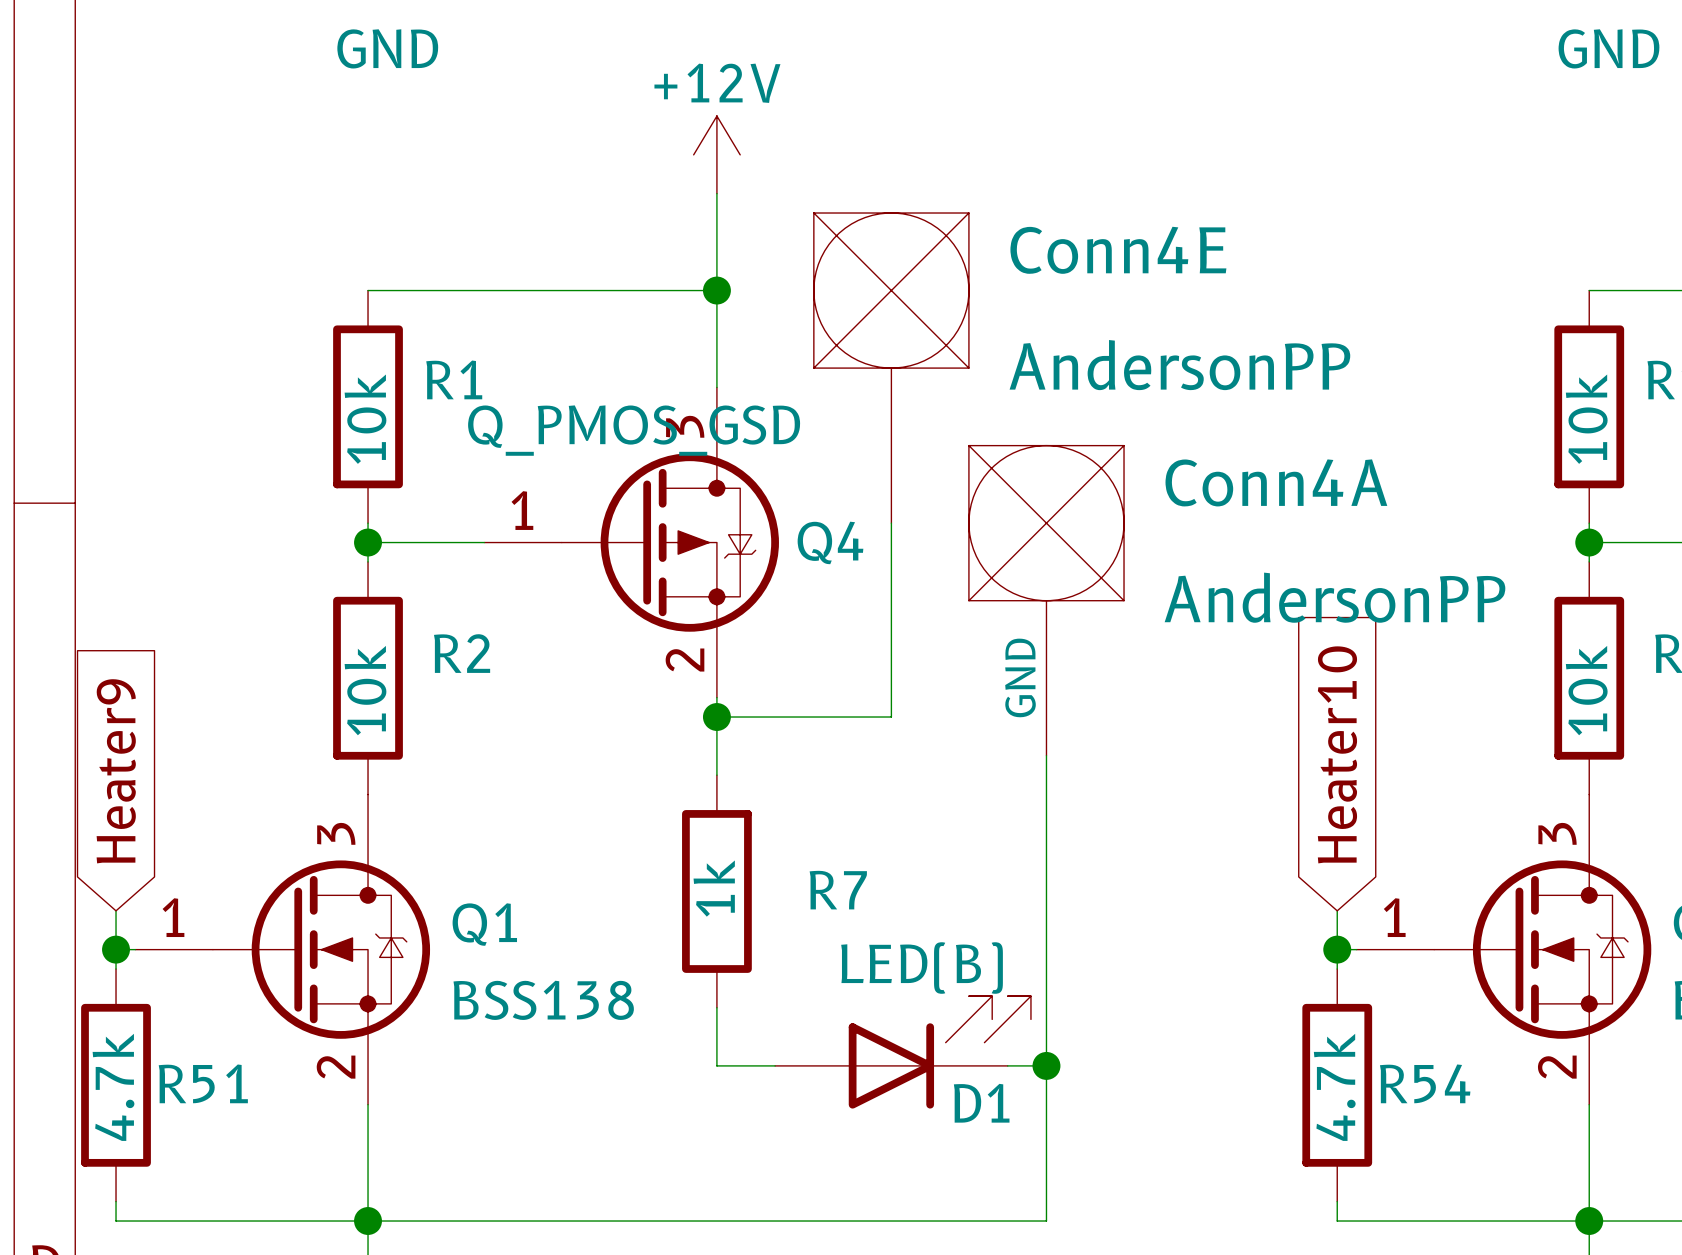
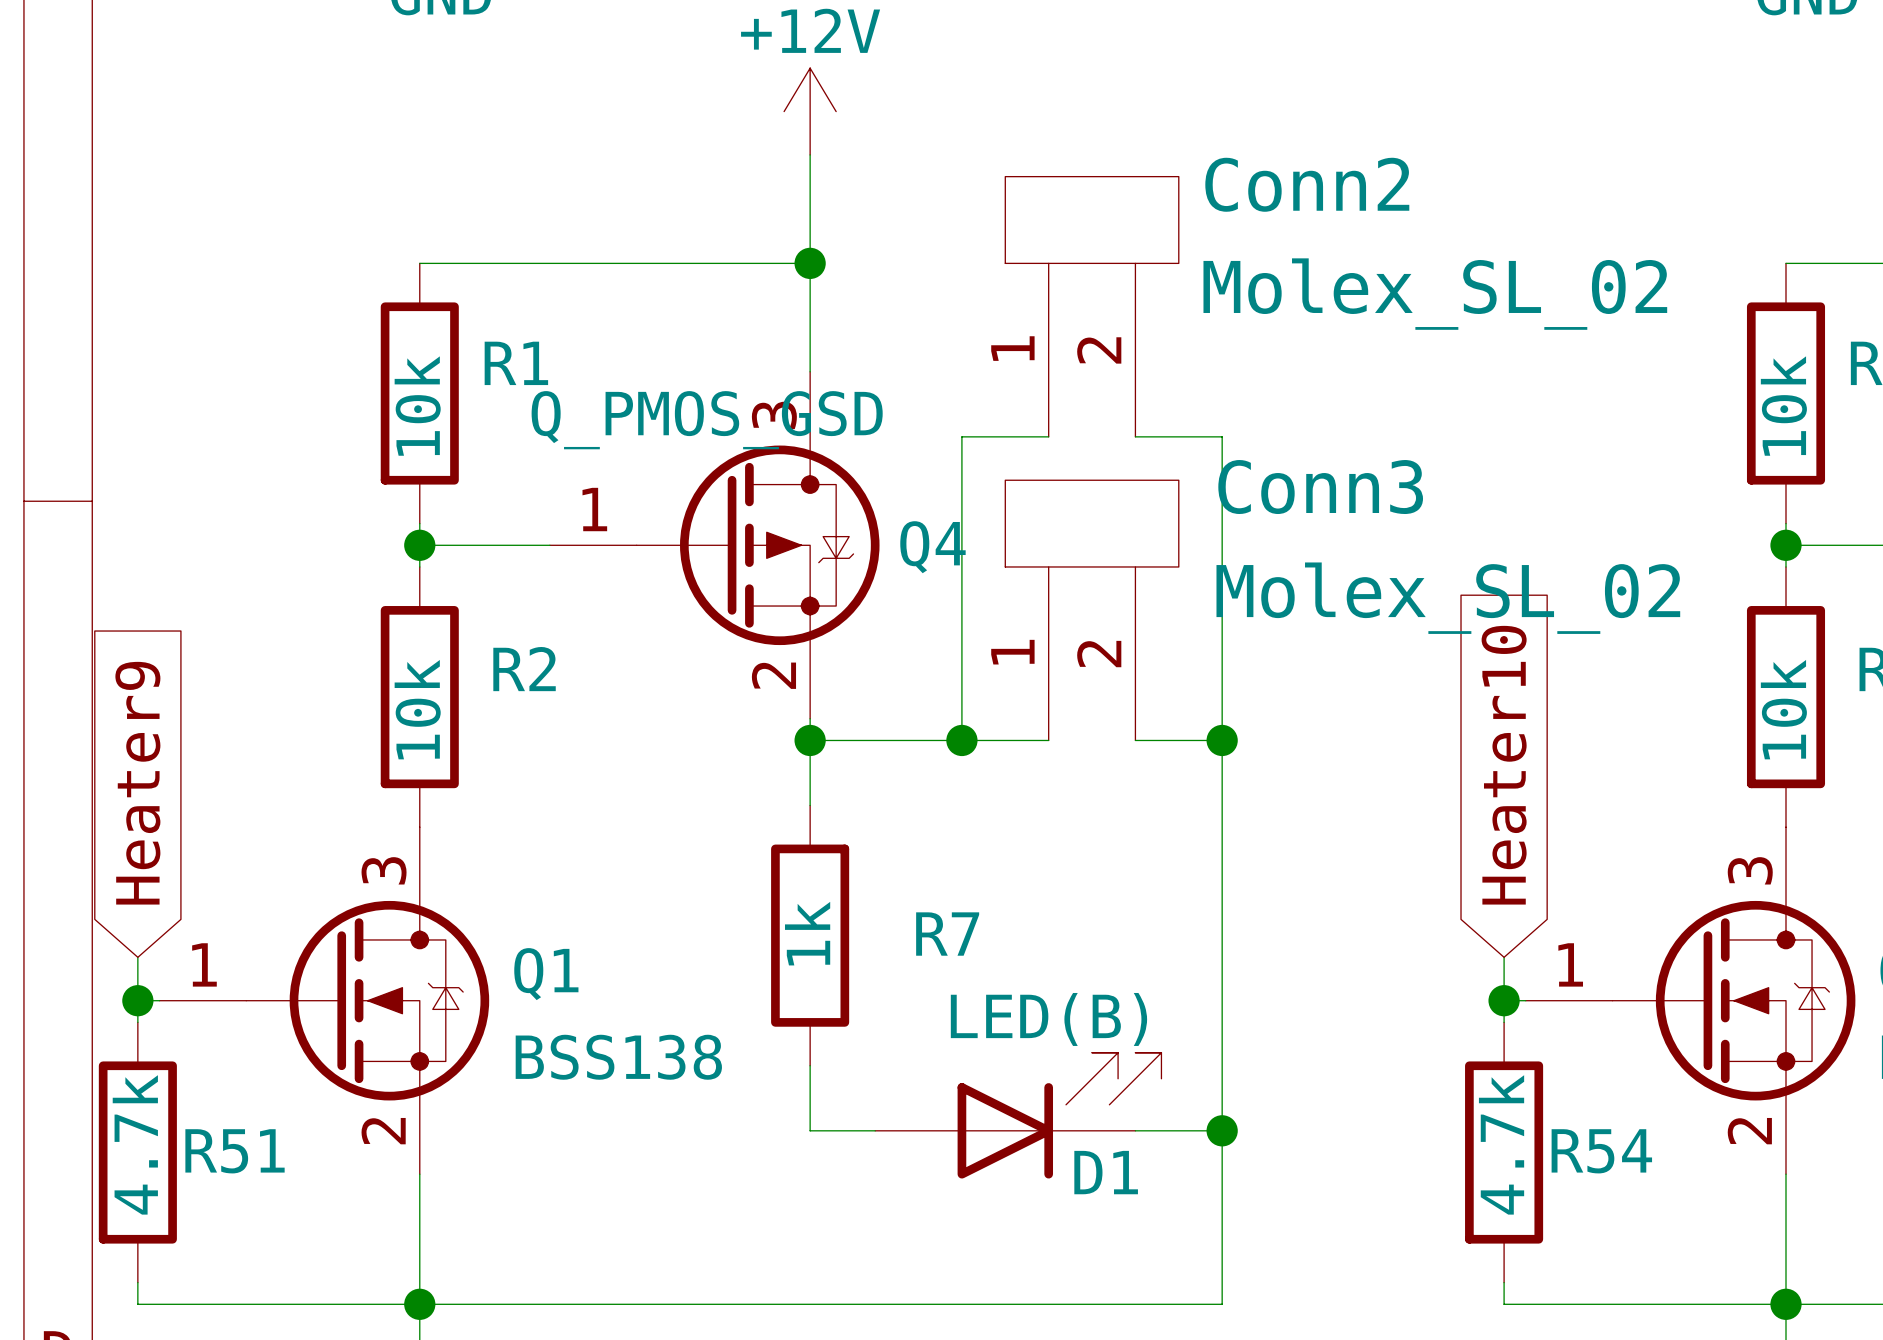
Conn2: none -> Molex_SL_02 (1092, 306)
Conn4E: AndersonPP (891, 368) -> none
wire: none -> (1048, 436) (961, 436) (961, 740)
wire: (891, 523) (891, 717) -> (1048, 740) (1005, 740)
Conn3: none -> Molex_SL_02 (1092, 610)
Conn4A: AndersonPP (1046, 600) -> none
junction: none -> (961, 740)
wire: none -> (1135, 740) (1222, 740)
junction: none -> (1222, 740)
wire: (1046, 755) (1046, 1221) -> (1135, 436) (1222, 436) (1222, 1304) (1178, 1304)
wire: none -> (1178, 1130) (1222, 1130)
junction position: (1046, 1065) -> (1222, 1130)

